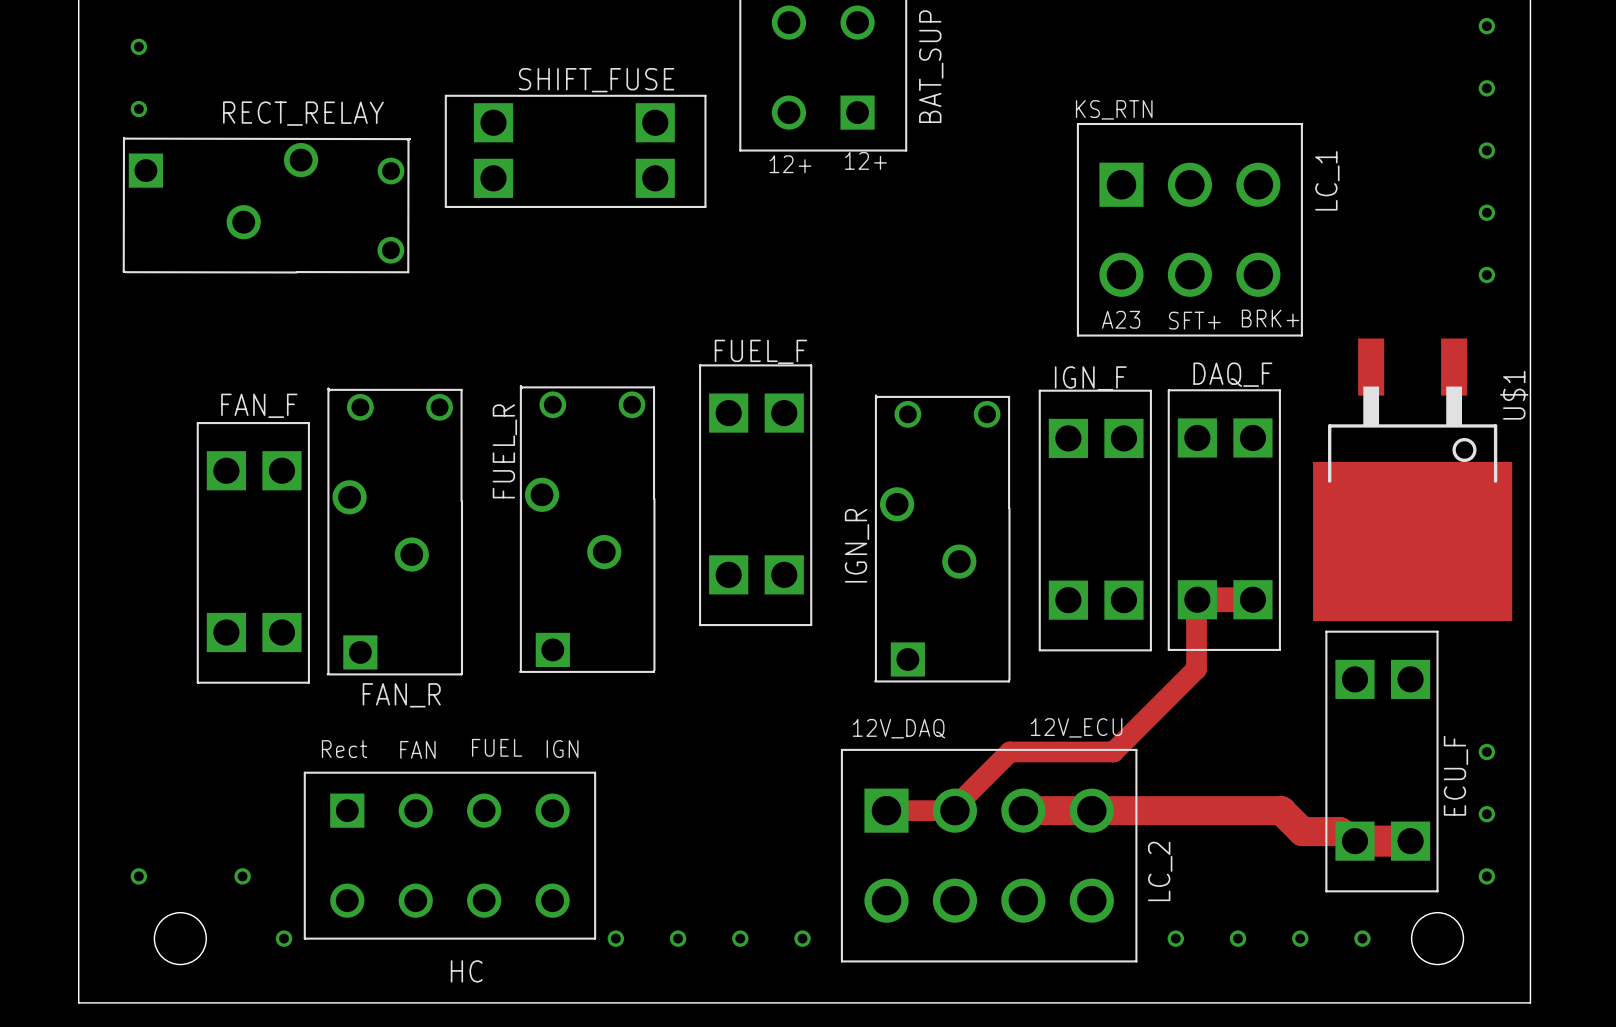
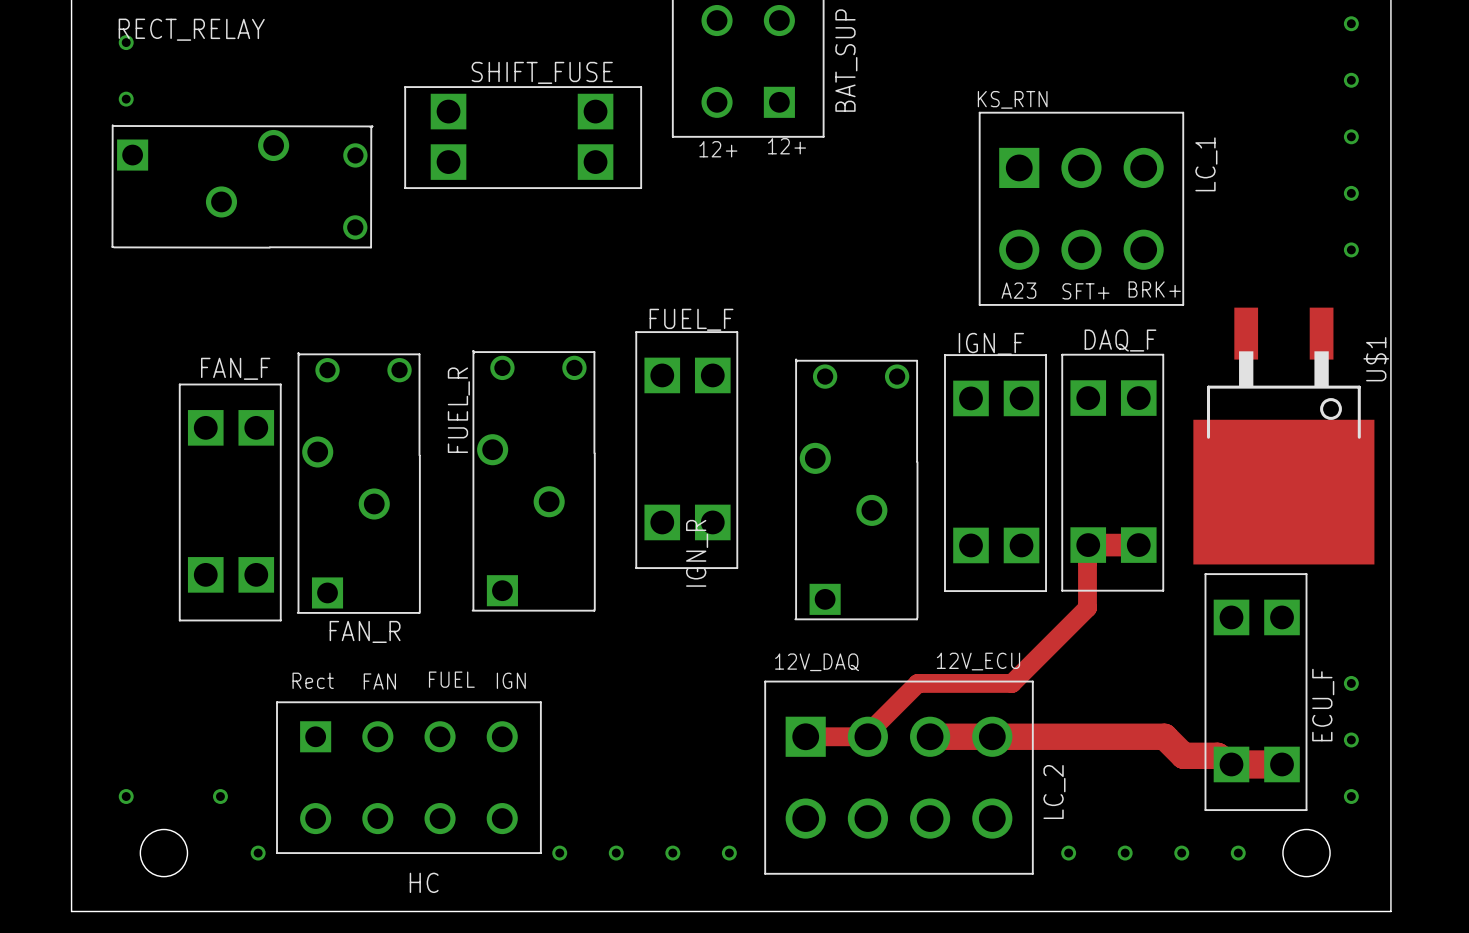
RECT_RELAY name position: RECT_RELAY (303, 113) -> RECT_RELAY (191, 29)
IGN_R name position: IGN_R (857, 545) -> IGN_R (697, 553)

